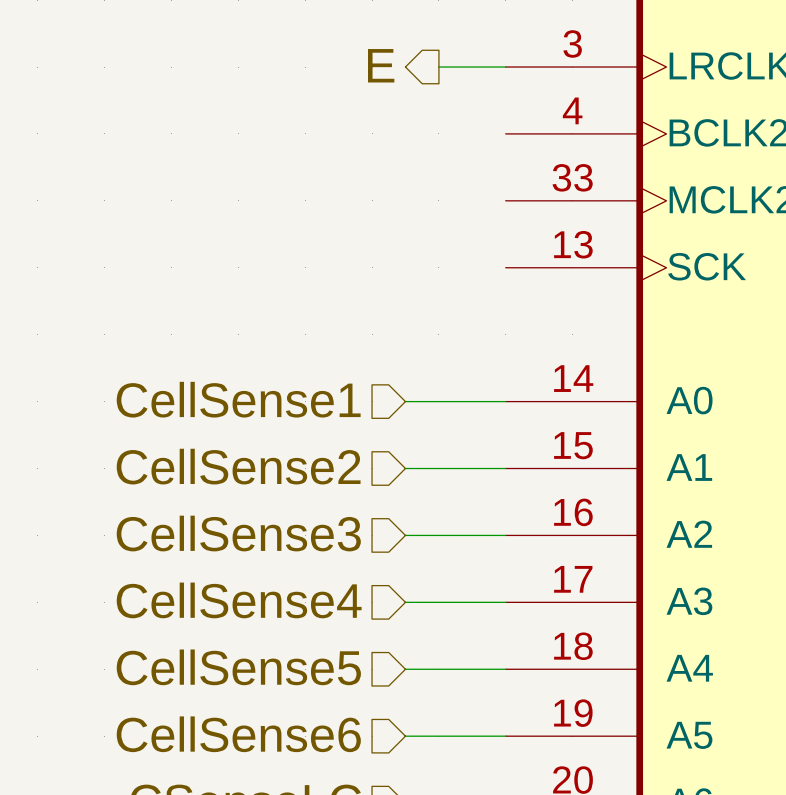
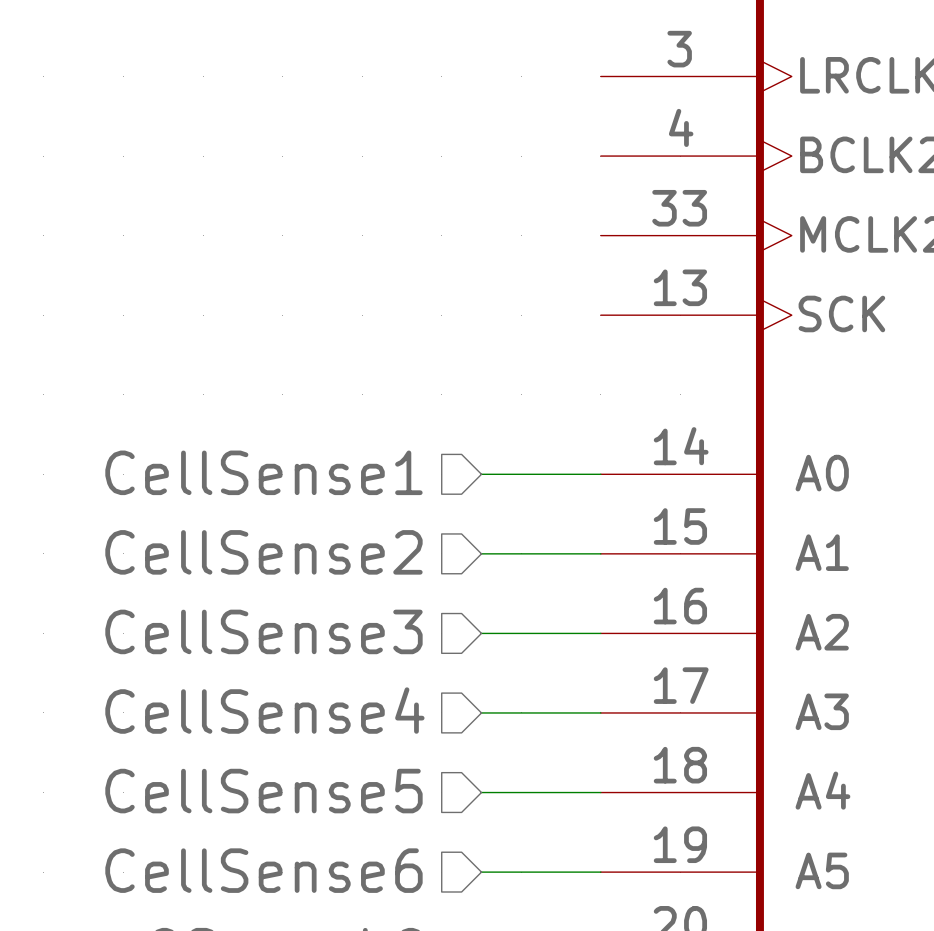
hierarchical label: E (381, 65) -> none
wire: (438, 67) (505, 67) -> none

